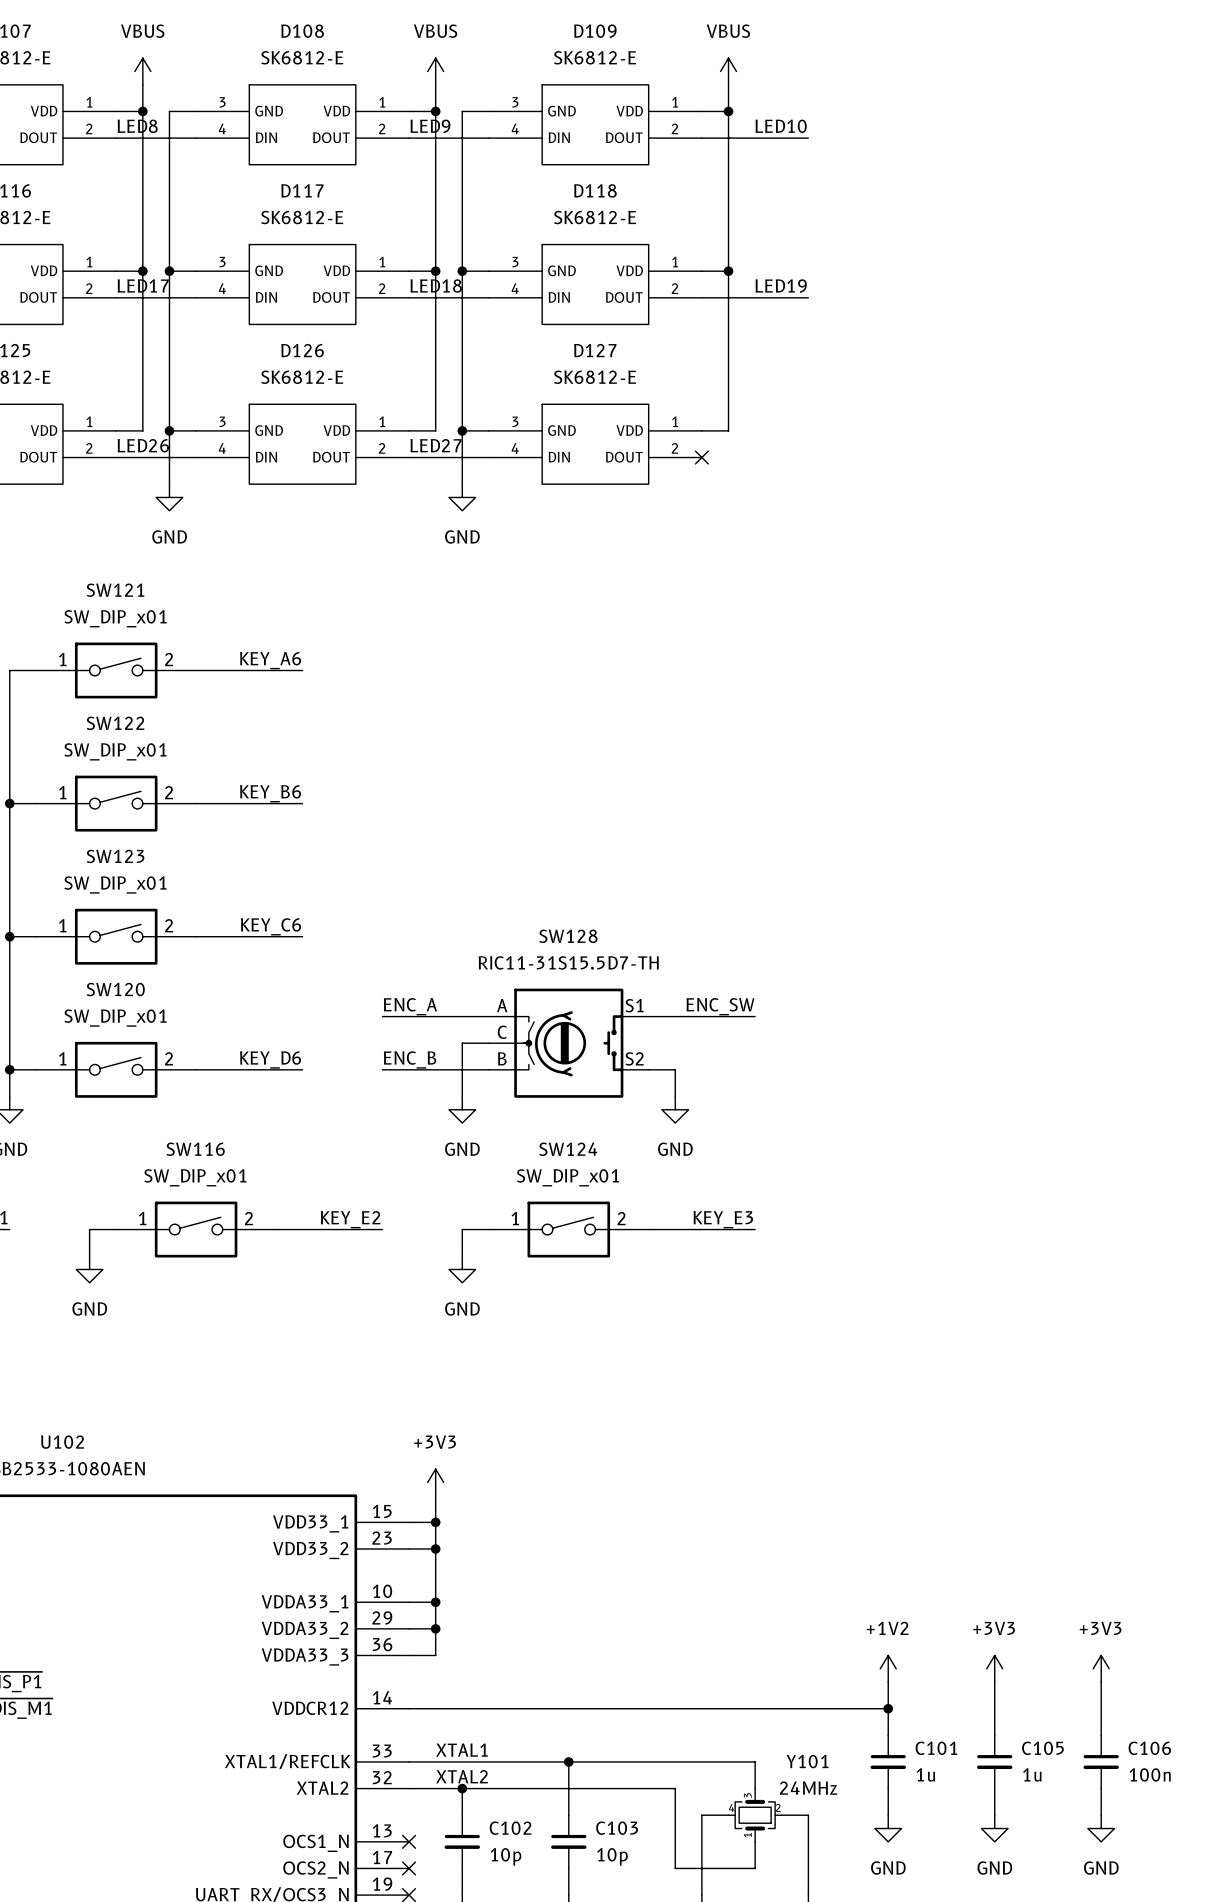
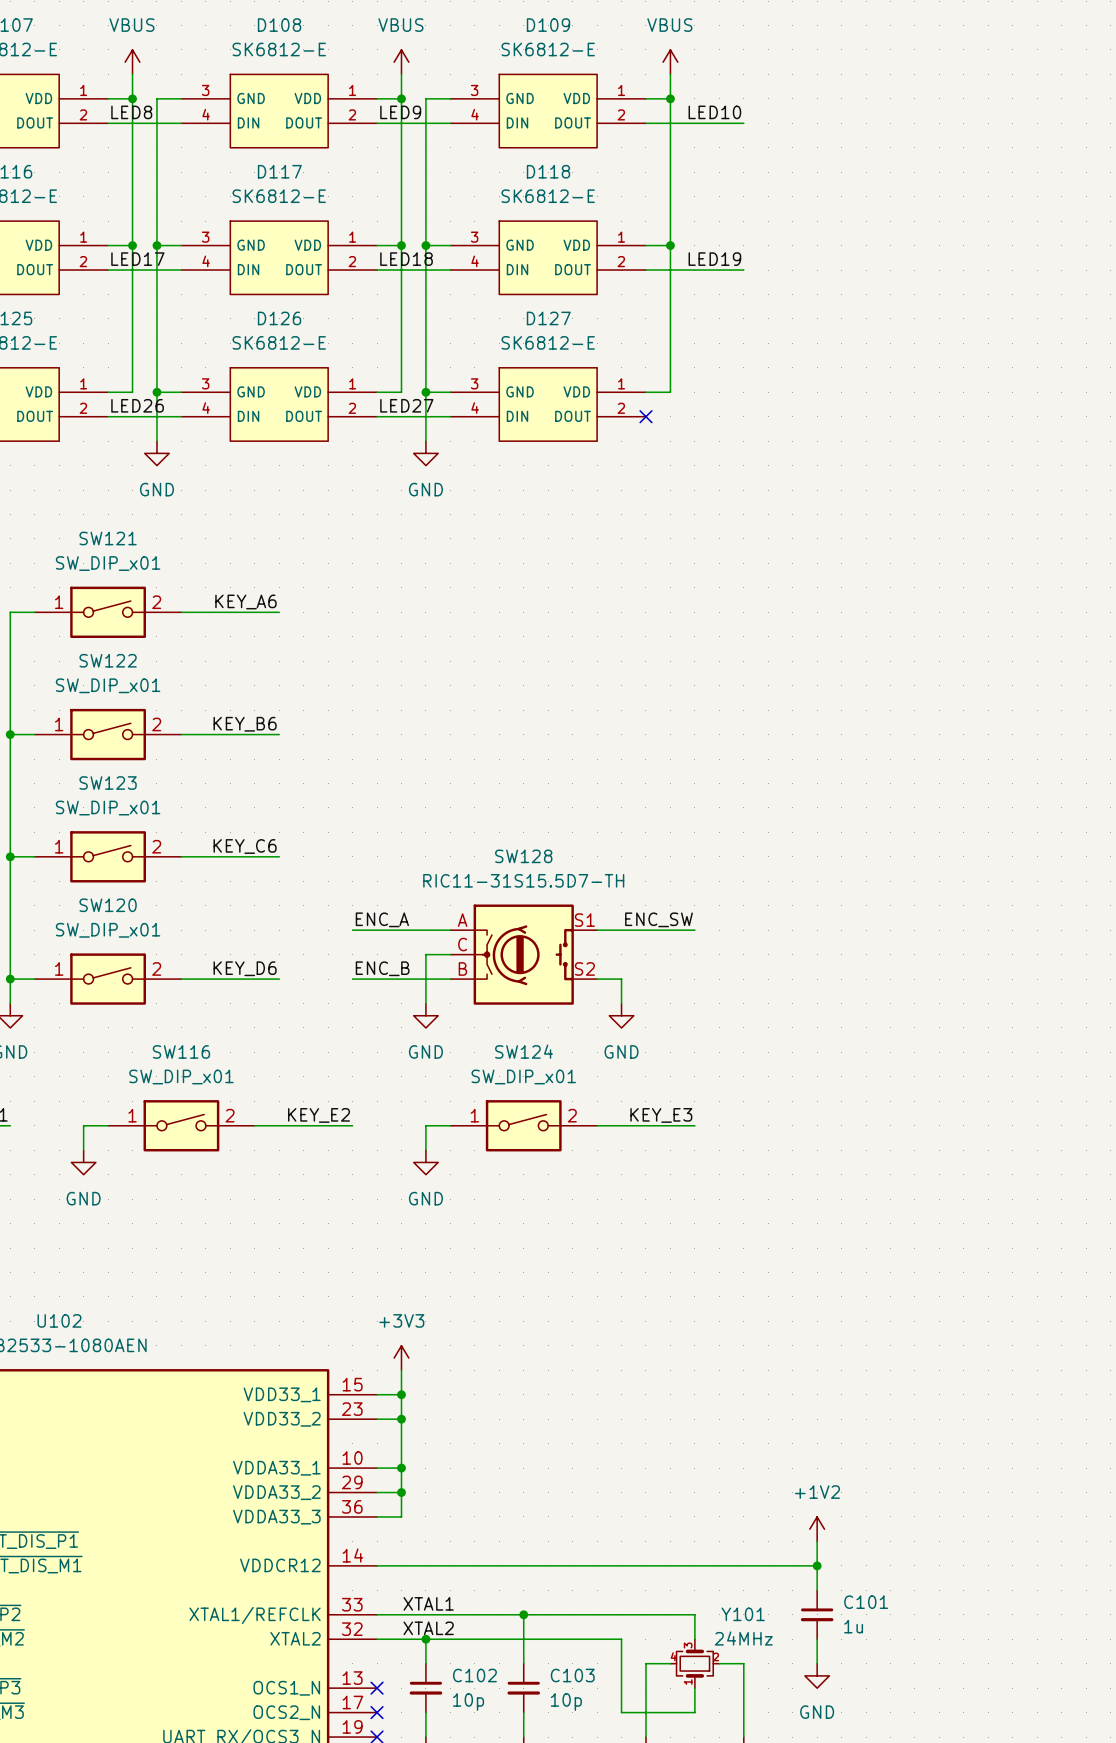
power symbol: +3V3 (994, 1668) -> none
power symbol: +3V3 (1101, 1668) -> none
wire: (994, 1682) (994, 1735) -> none
wire: (1101, 1682) (1101, 1735) -> none
C105: 1u (994, 1761) -> none
C106: 100n (1101, 1761) -> none
wire: (994, 1788) (994, 1815) -> none
wire: (1101, 1788) (1101, 1815) -> none
power symbol: GND (994, 1828) -> none
power symbol: GND (1101, 1828) -> none

